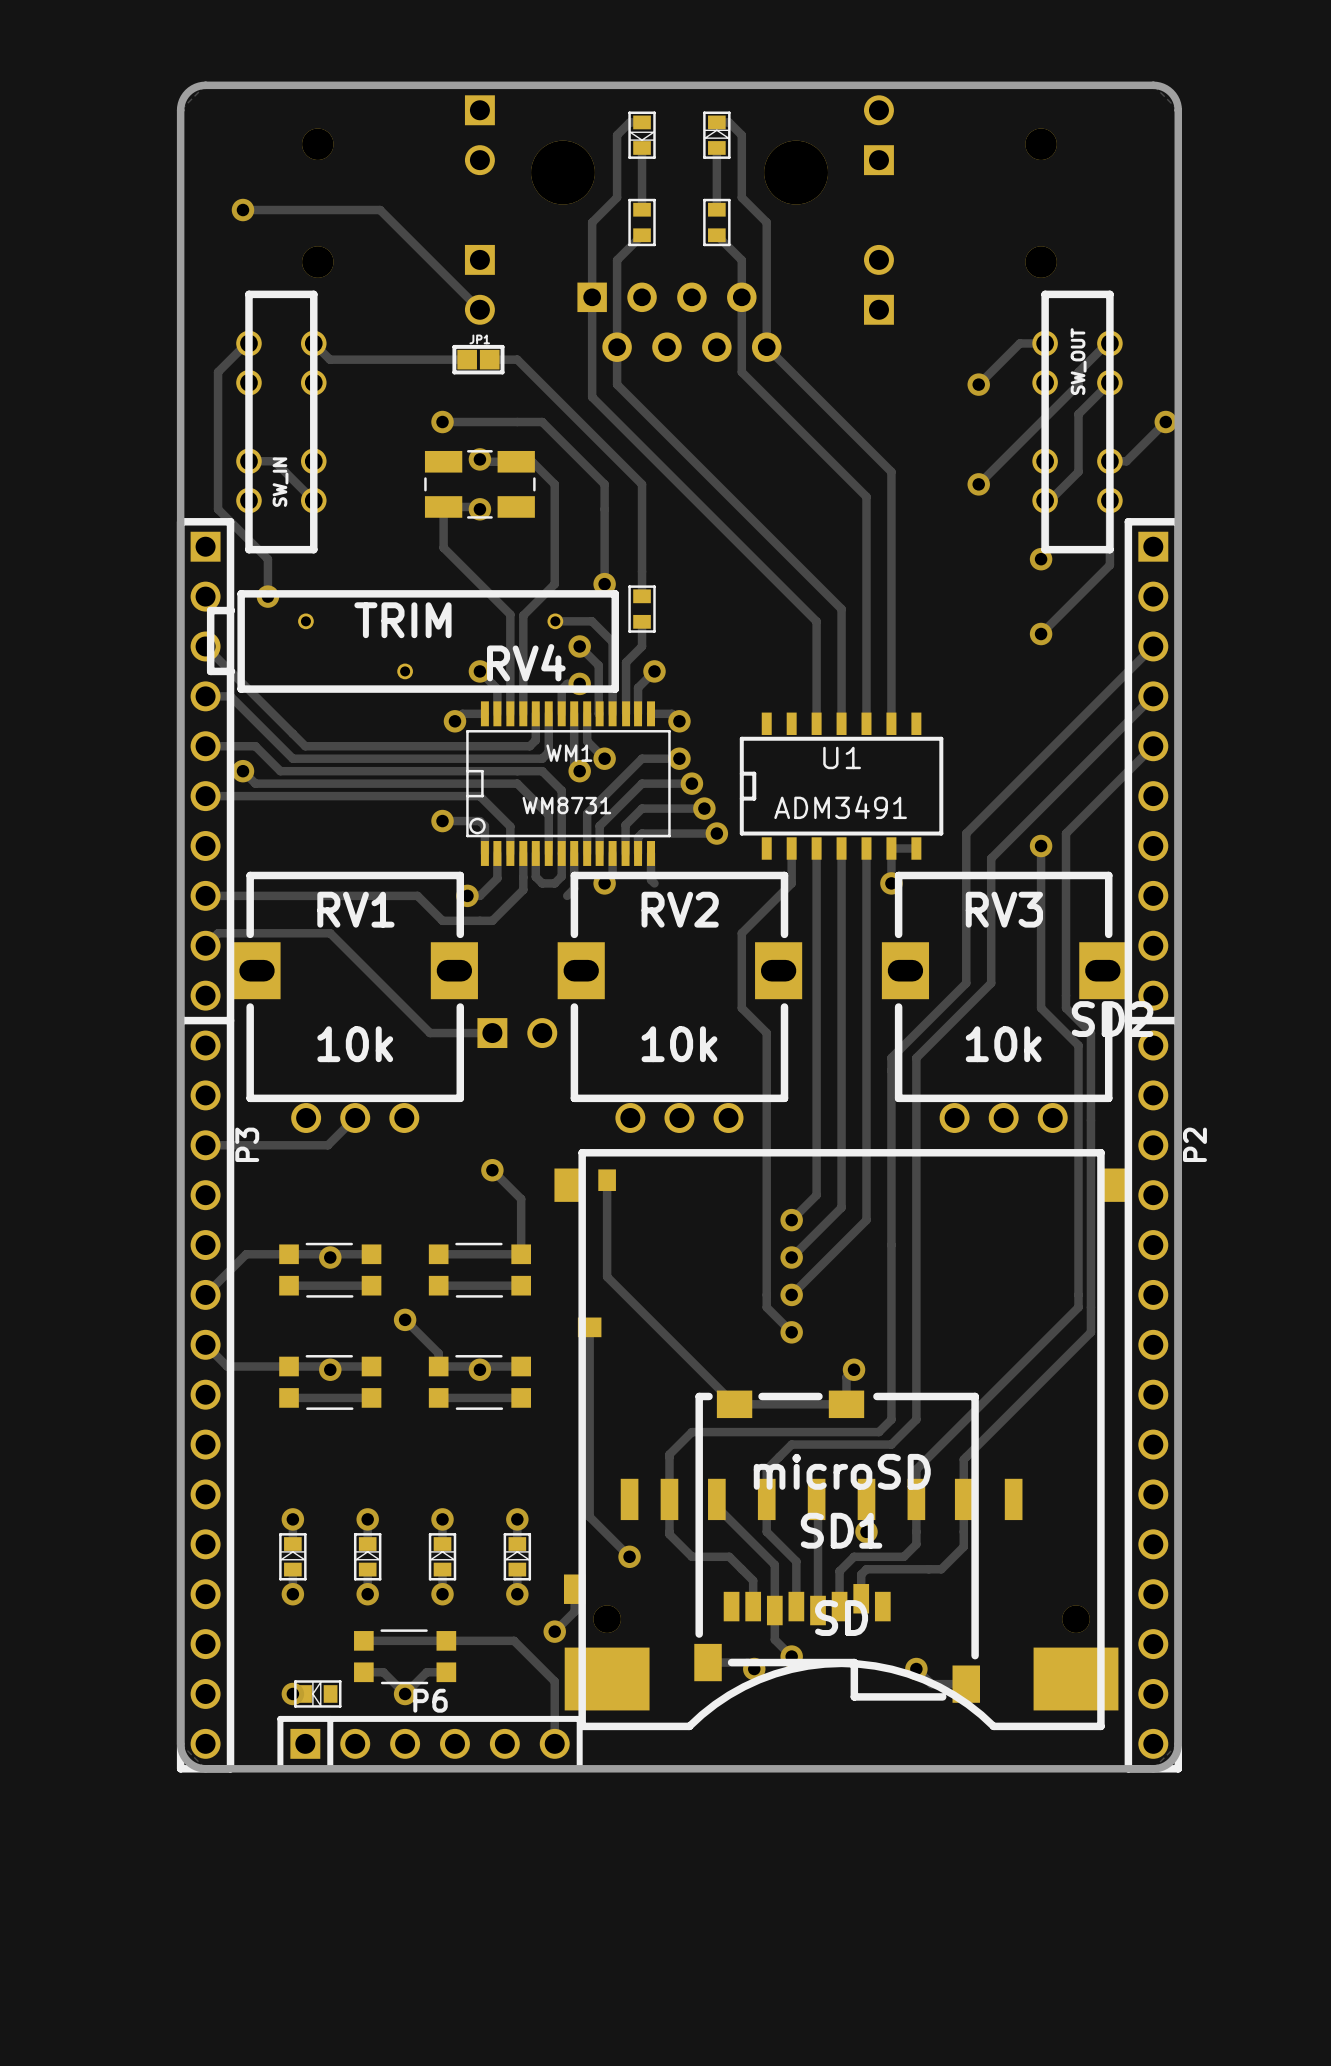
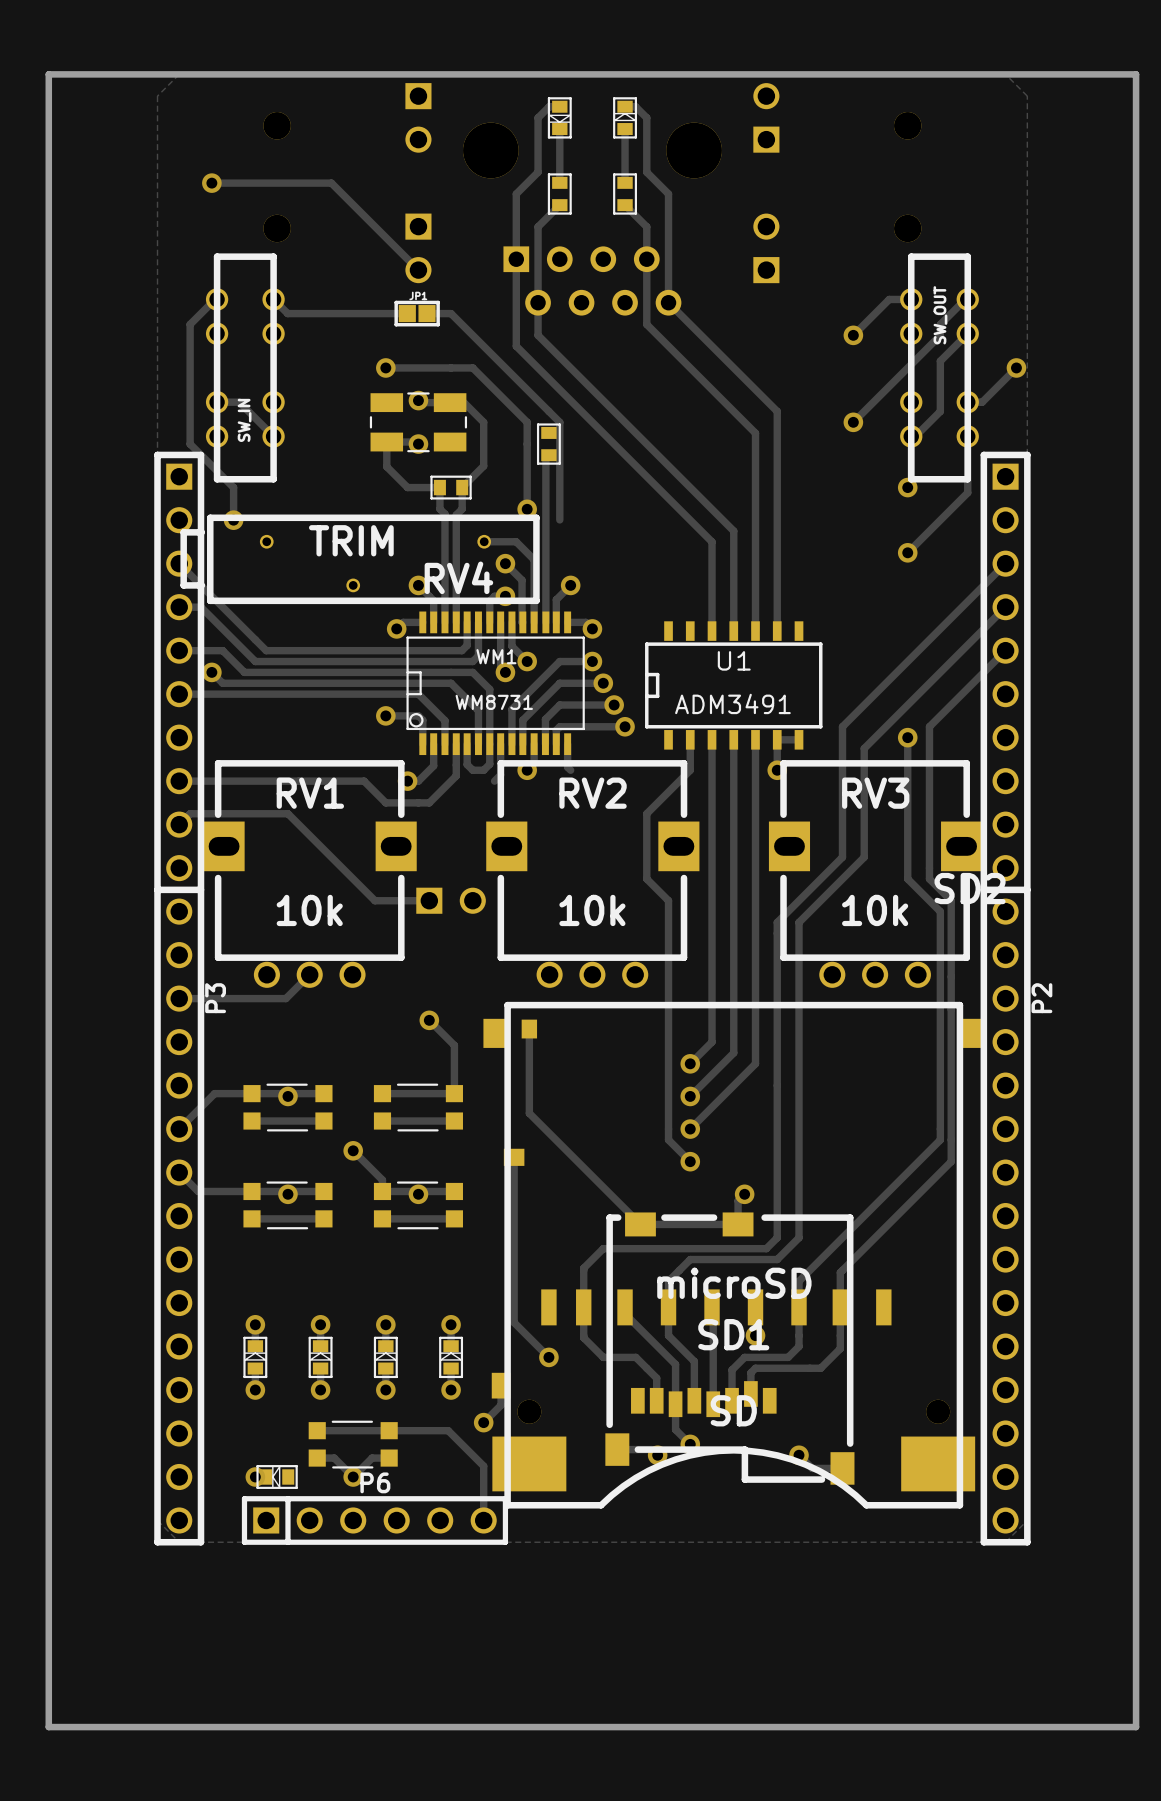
board edge: (205, 85) (196, 87) (187, 92) (182, 100) (180, 110) (180, 1743) (182, 1753) (187, 1761) (196, 1766) (205, 1768) (1153, 1768) (1165, 1765) (1174, 1756) (1178, 1743) (1178, 110) (1176, 100) (1170, 92) (1162, 87) (1153, 85) -> (179, 74) (48, 74) (48, 1727) (1136, 1727) (1136, 74) (1005, 74)
part: none -> (548, 444)
track: (554, 534) (554, 584) (523, 615) -> (483, 466) (462, 487) (462, 509) (456, 514) (456, 536)
track: (443, 535) (443, 547) (510, 614) -> (386, 466) (407, 487) (439, 487) (439, 509) (444, 514) (444, 535)
part: none -> (451, 487)
part: (642, 609) -> none
track: (642, 621) (642, 646) (626, 662) -> (548, 455) (545, 458) (545, 577)

